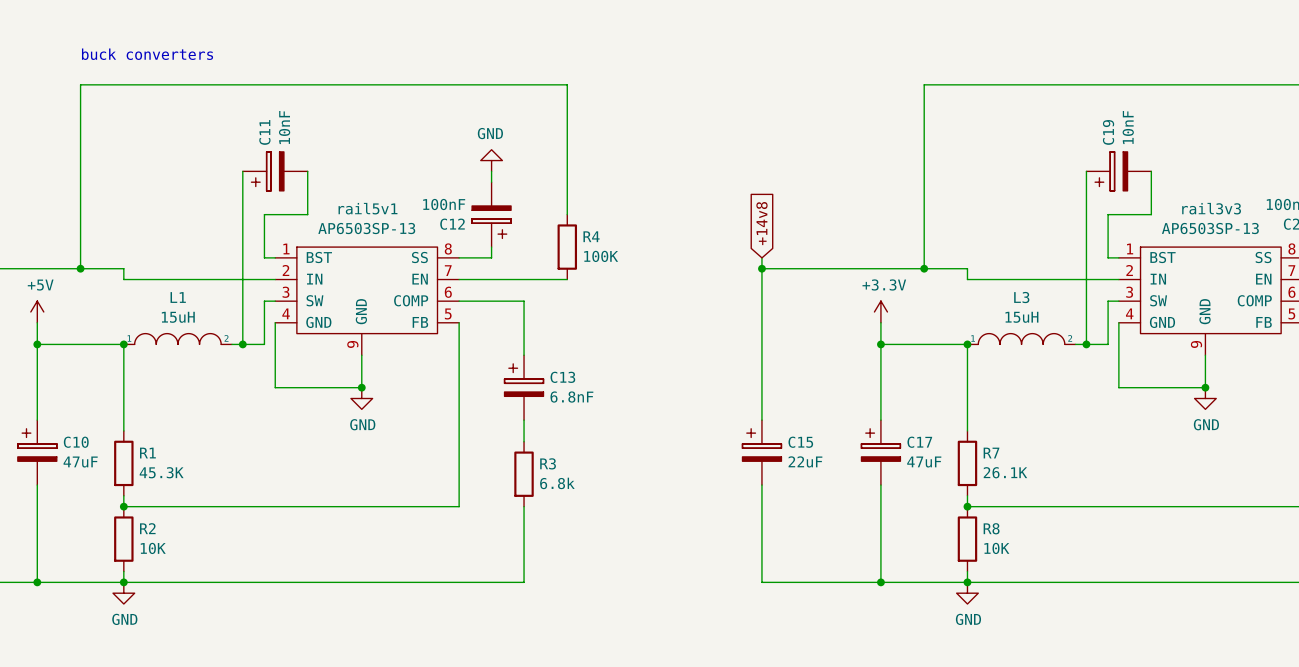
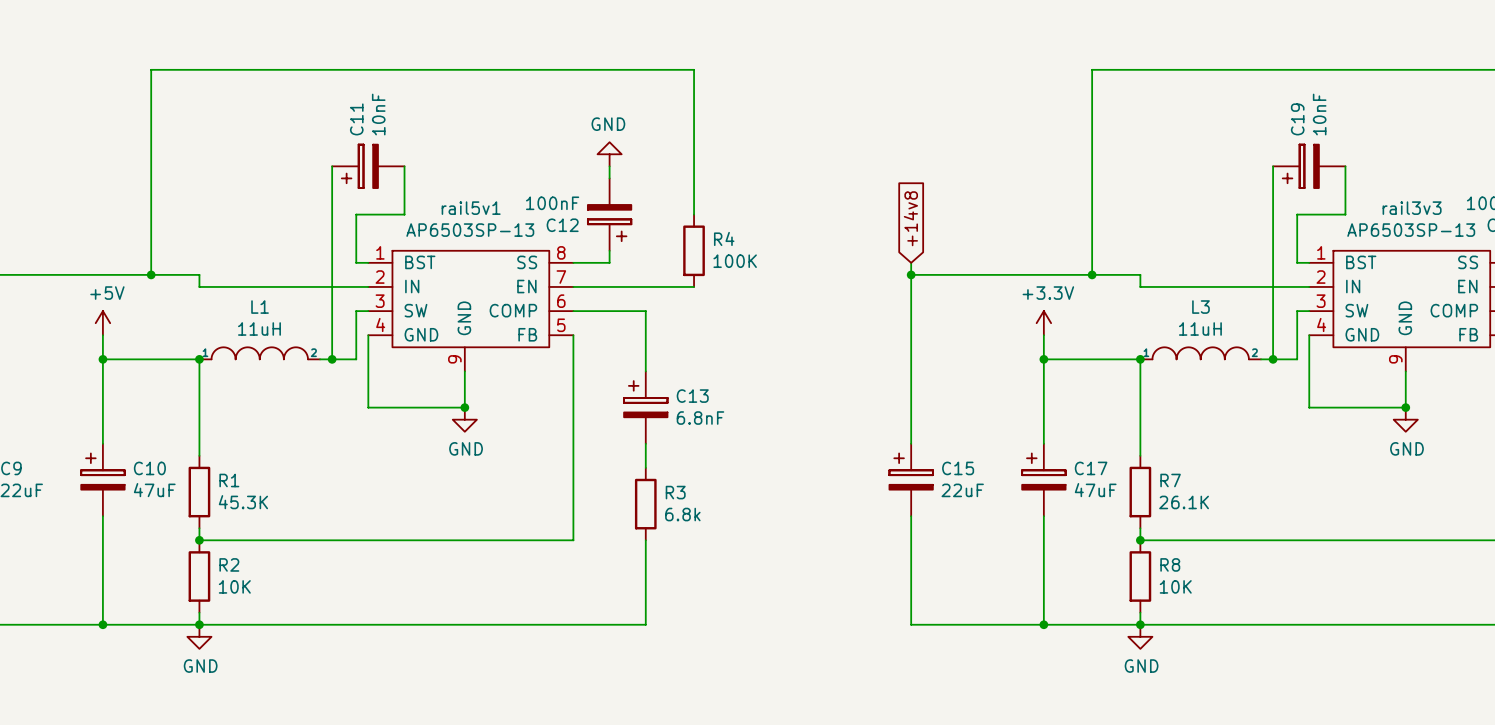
text: buck converters (147, 54) -> none
L1 value: 15uH (178, 317) -> 11uH (259, 328)
L3 value: 15uH (1021, 317) -> 11uH (1200, 328)

